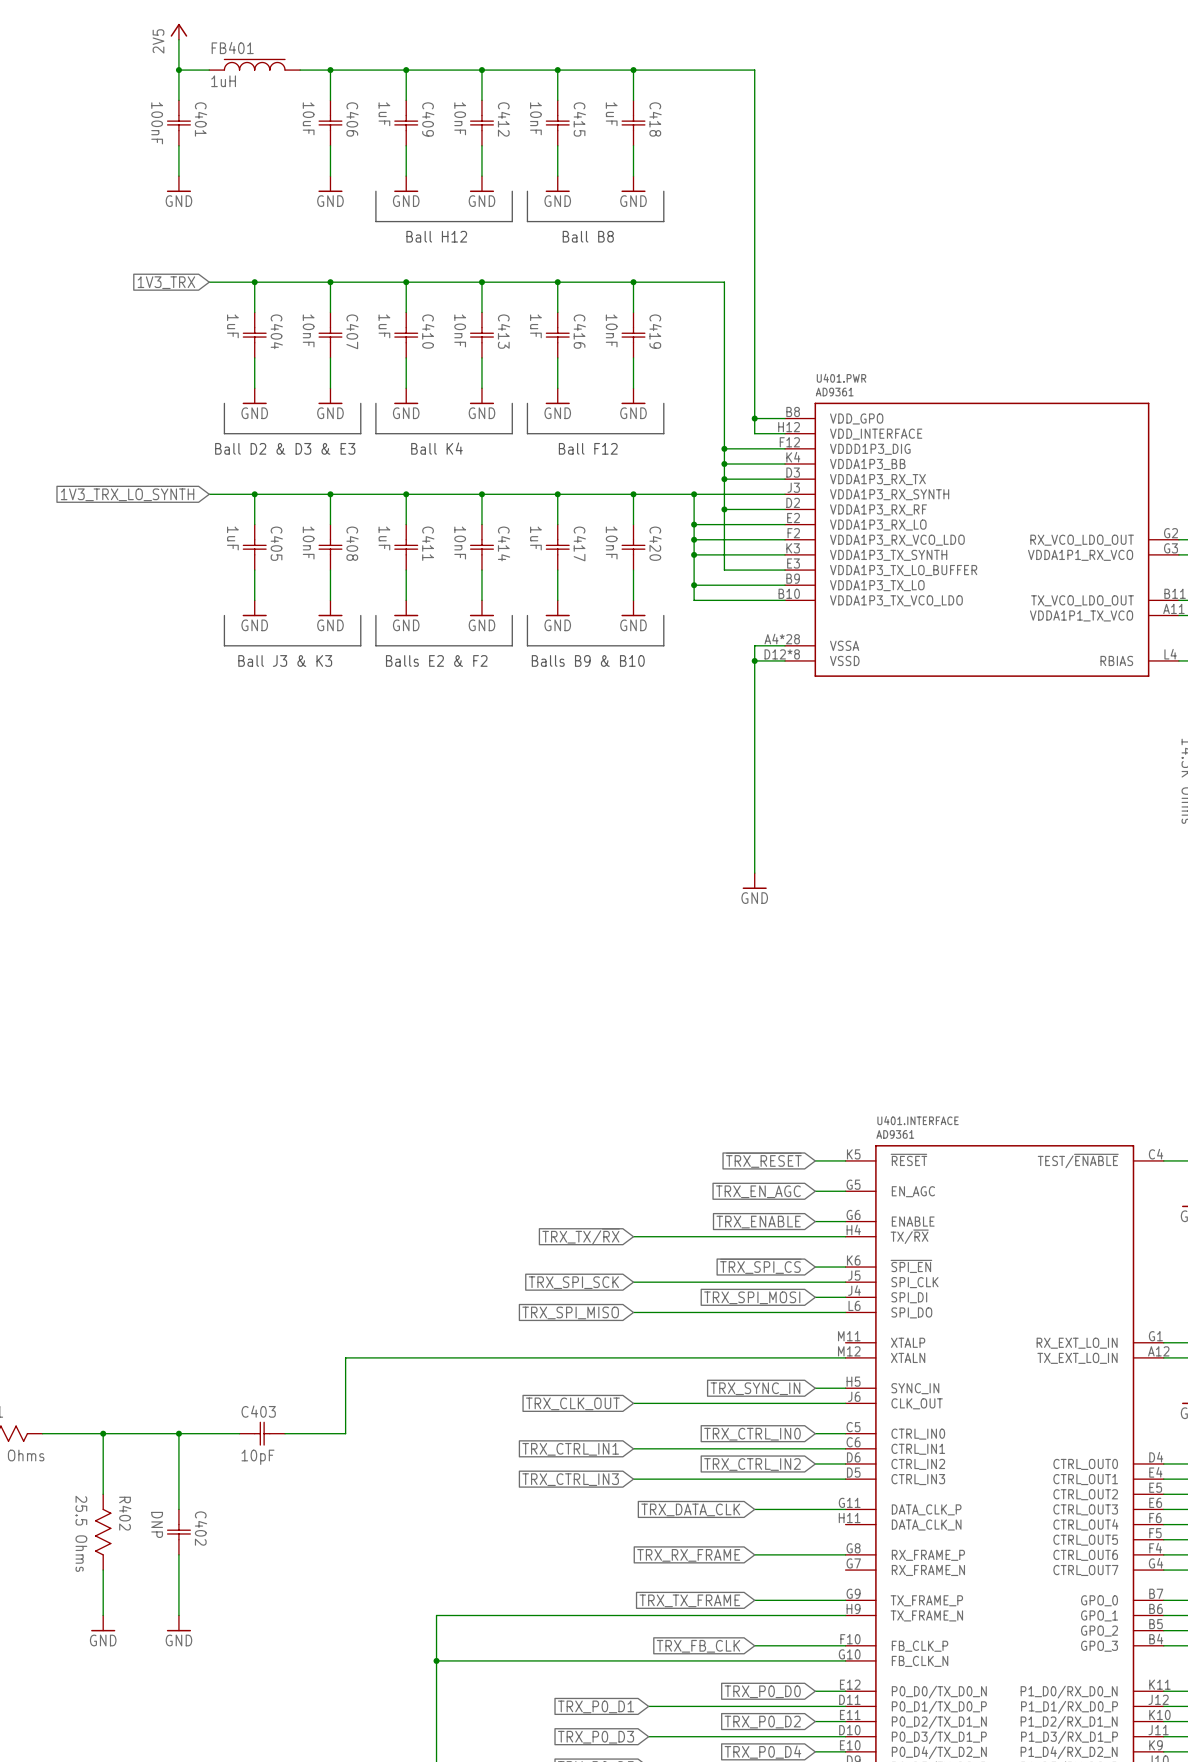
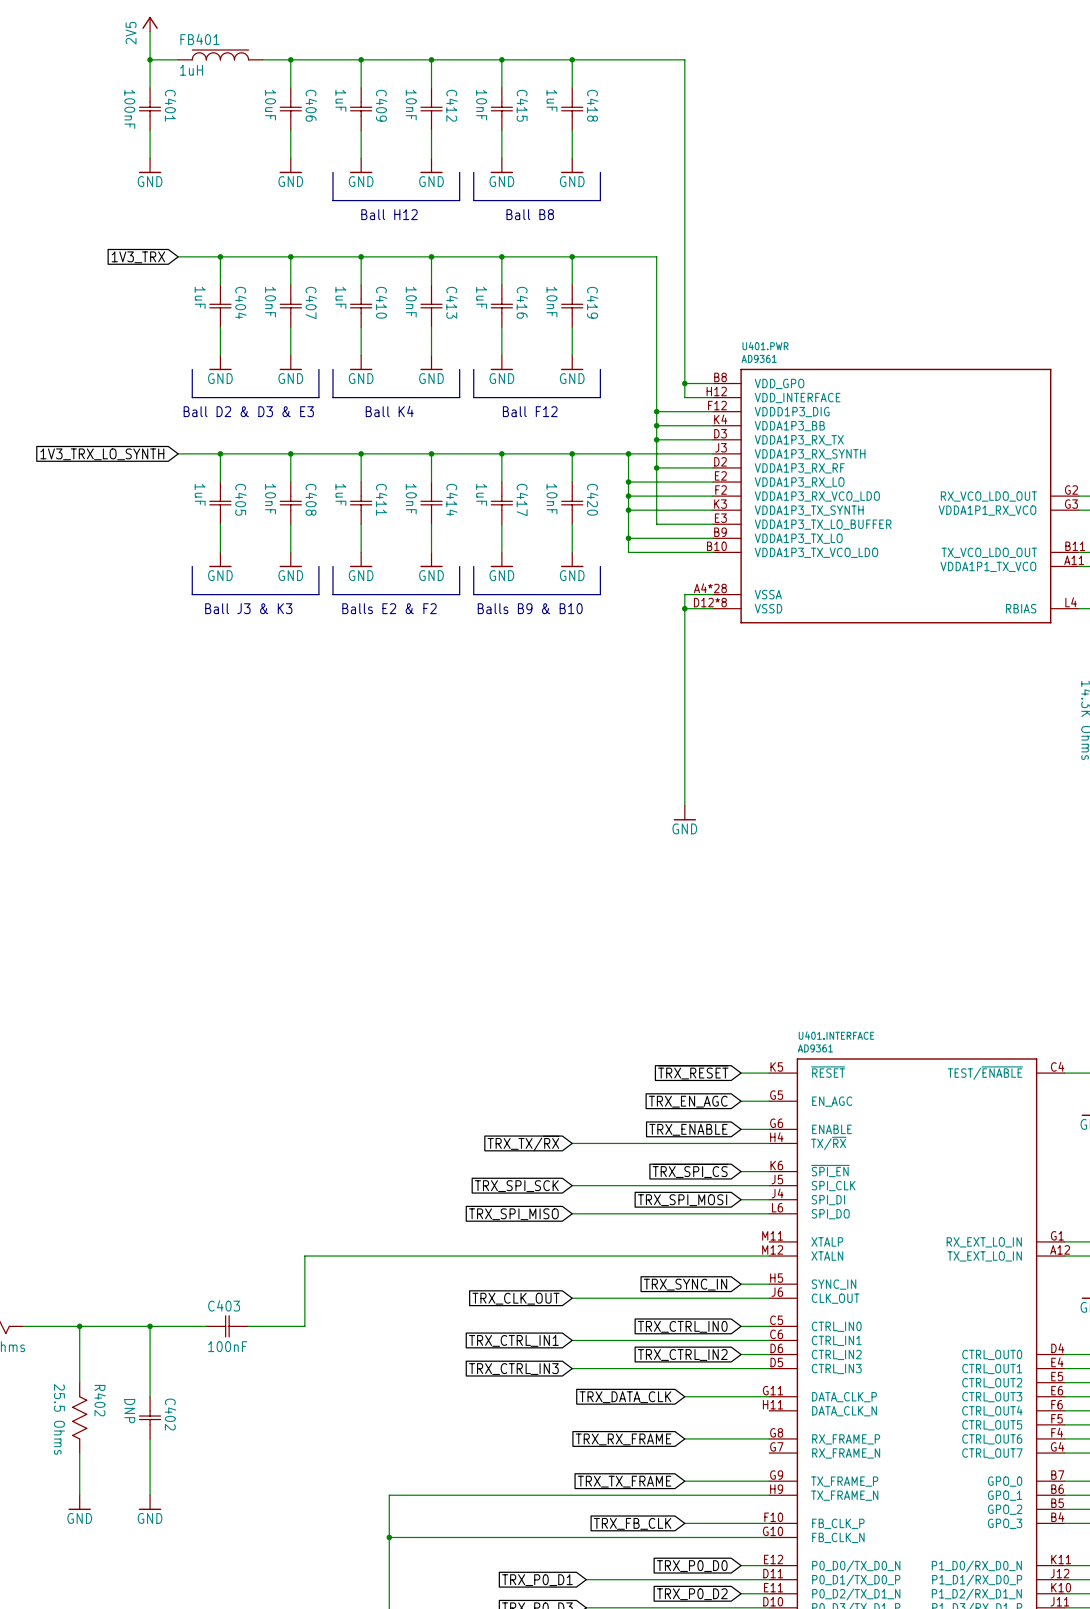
C403 value: 10pF (257, 1457) -> 100nF (227, 1346)

